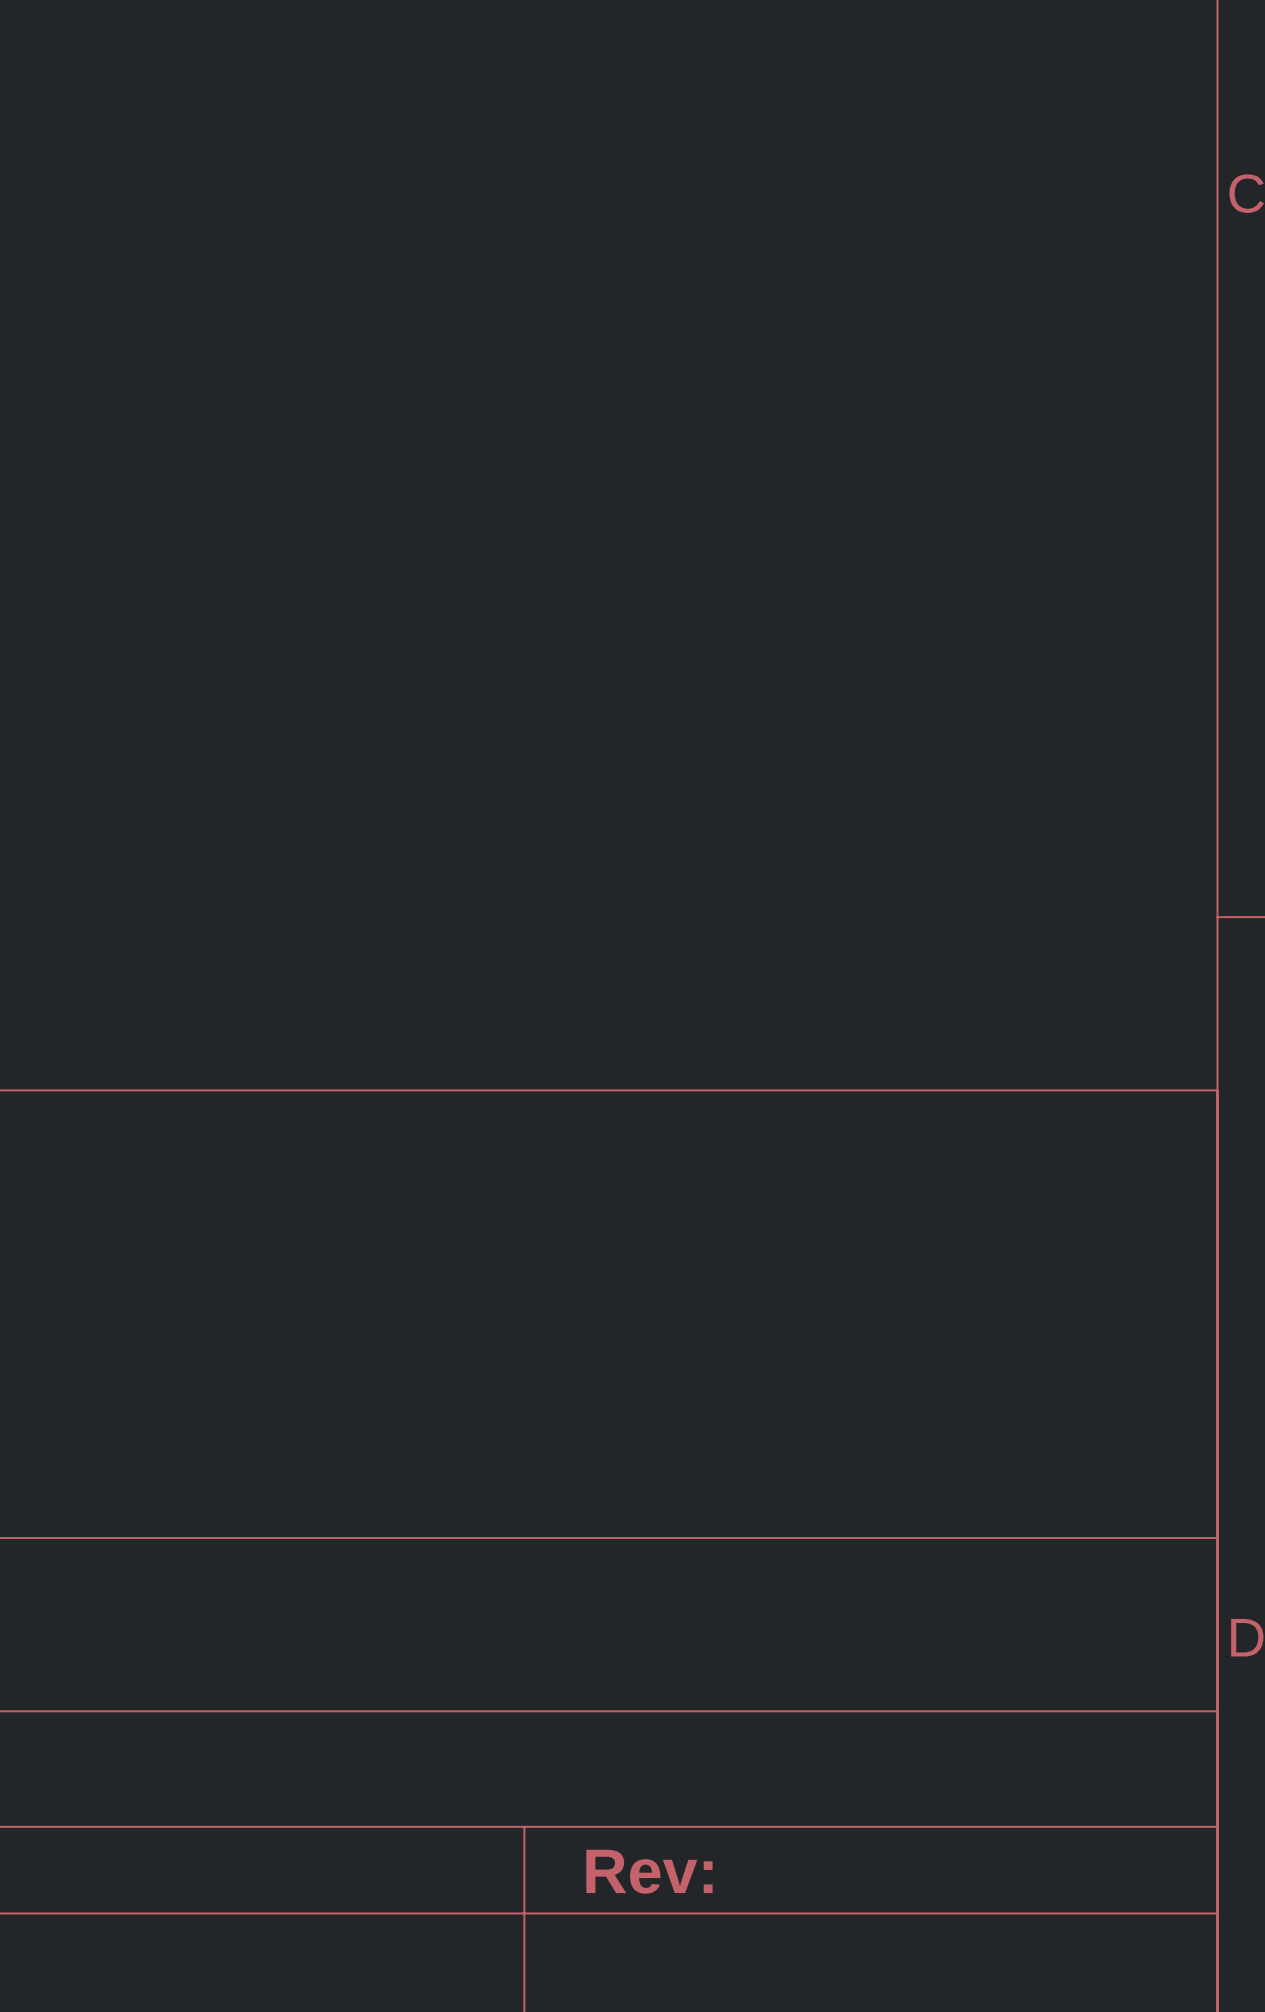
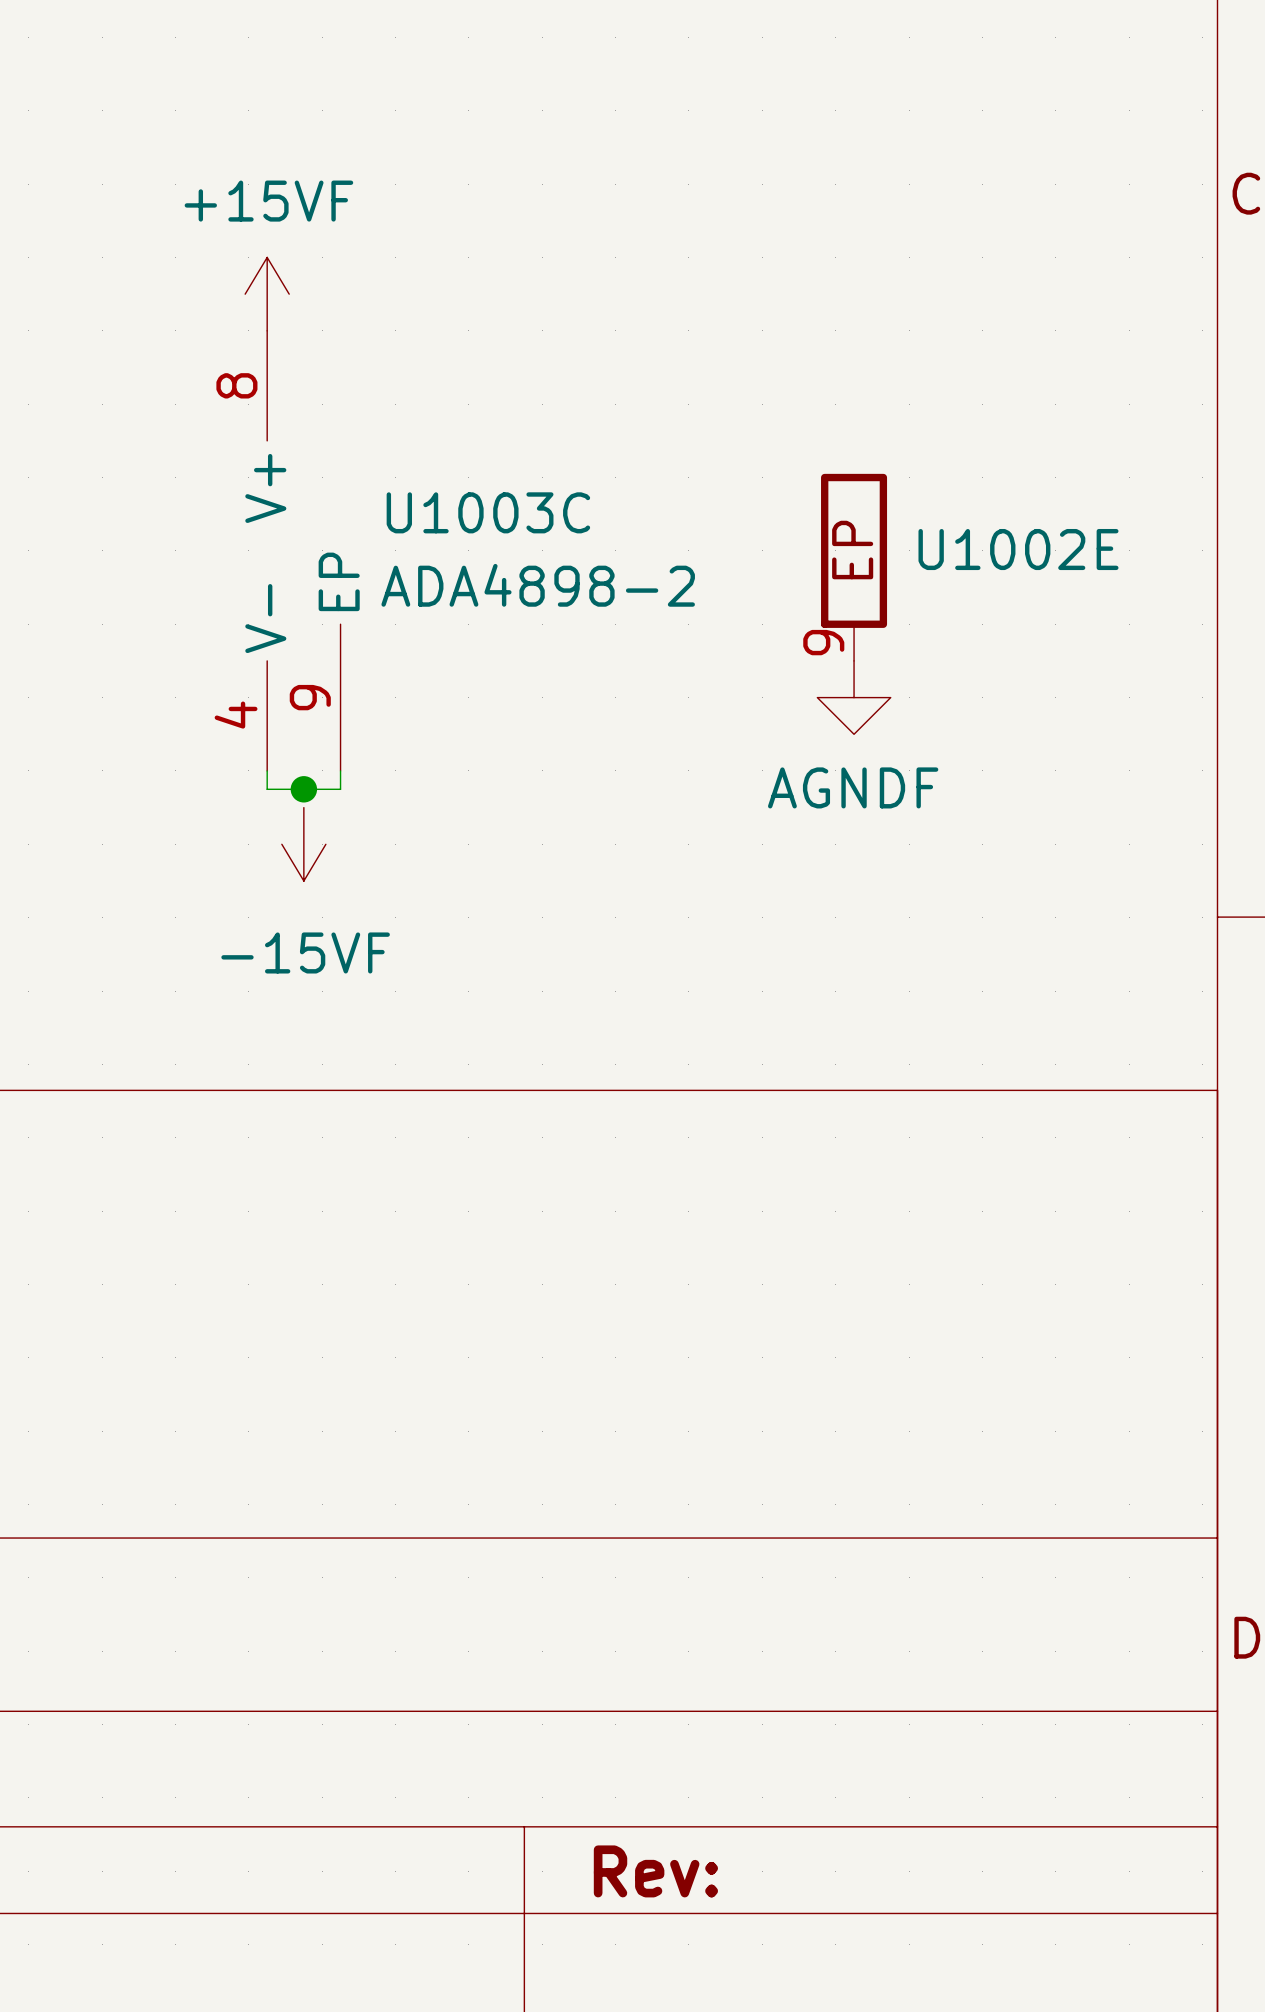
power symbol: none -> +15VF (267, 294)
U1003C: none -> ADA4898-2 (303, 550)
U1002E: none -> (854, 567)
power symbol: none -> AGNDF (854, 697)
wire: none -> (267, 770) (267, 789) (340, 789) (340, 770)
junction: none -> (303, 789)
power symbol: none -> -15VF (303, 844)

